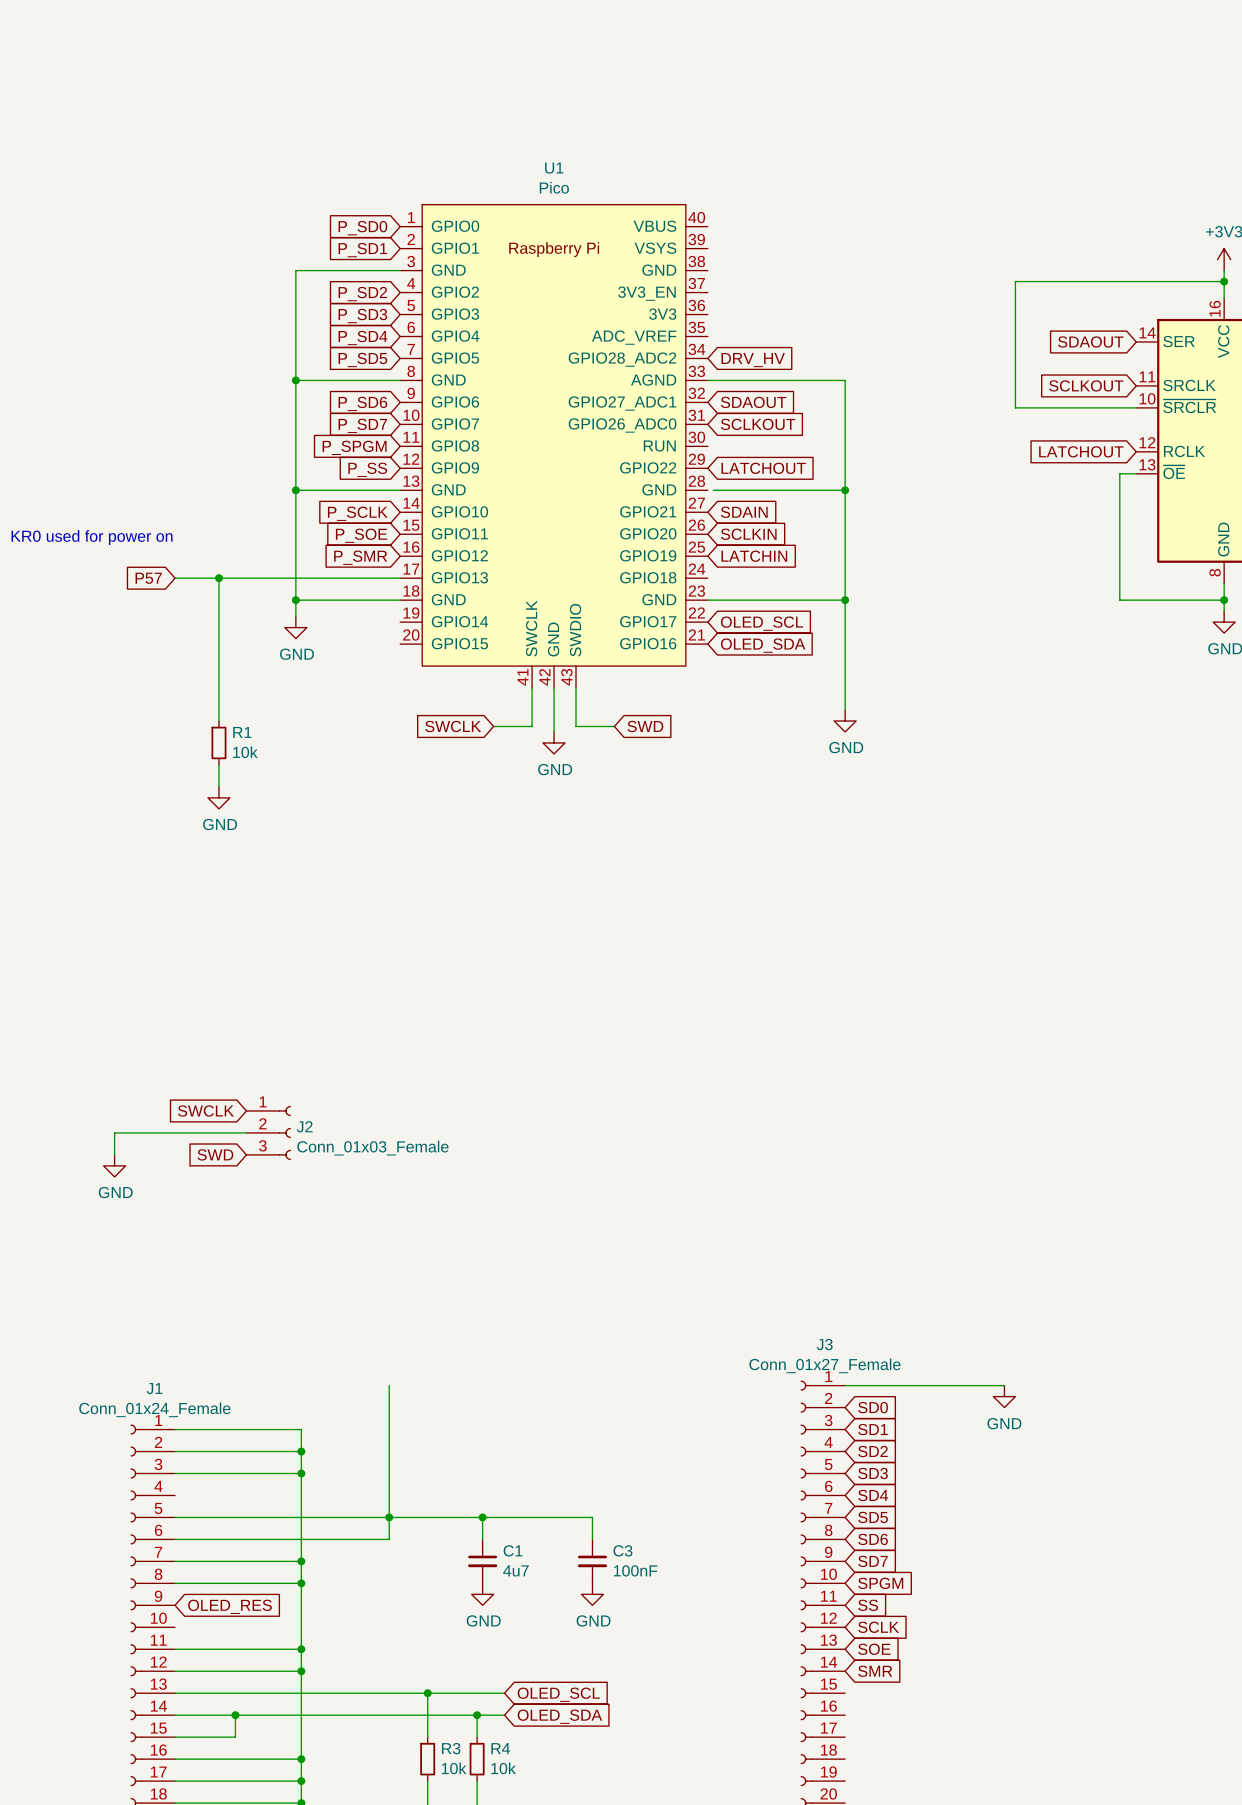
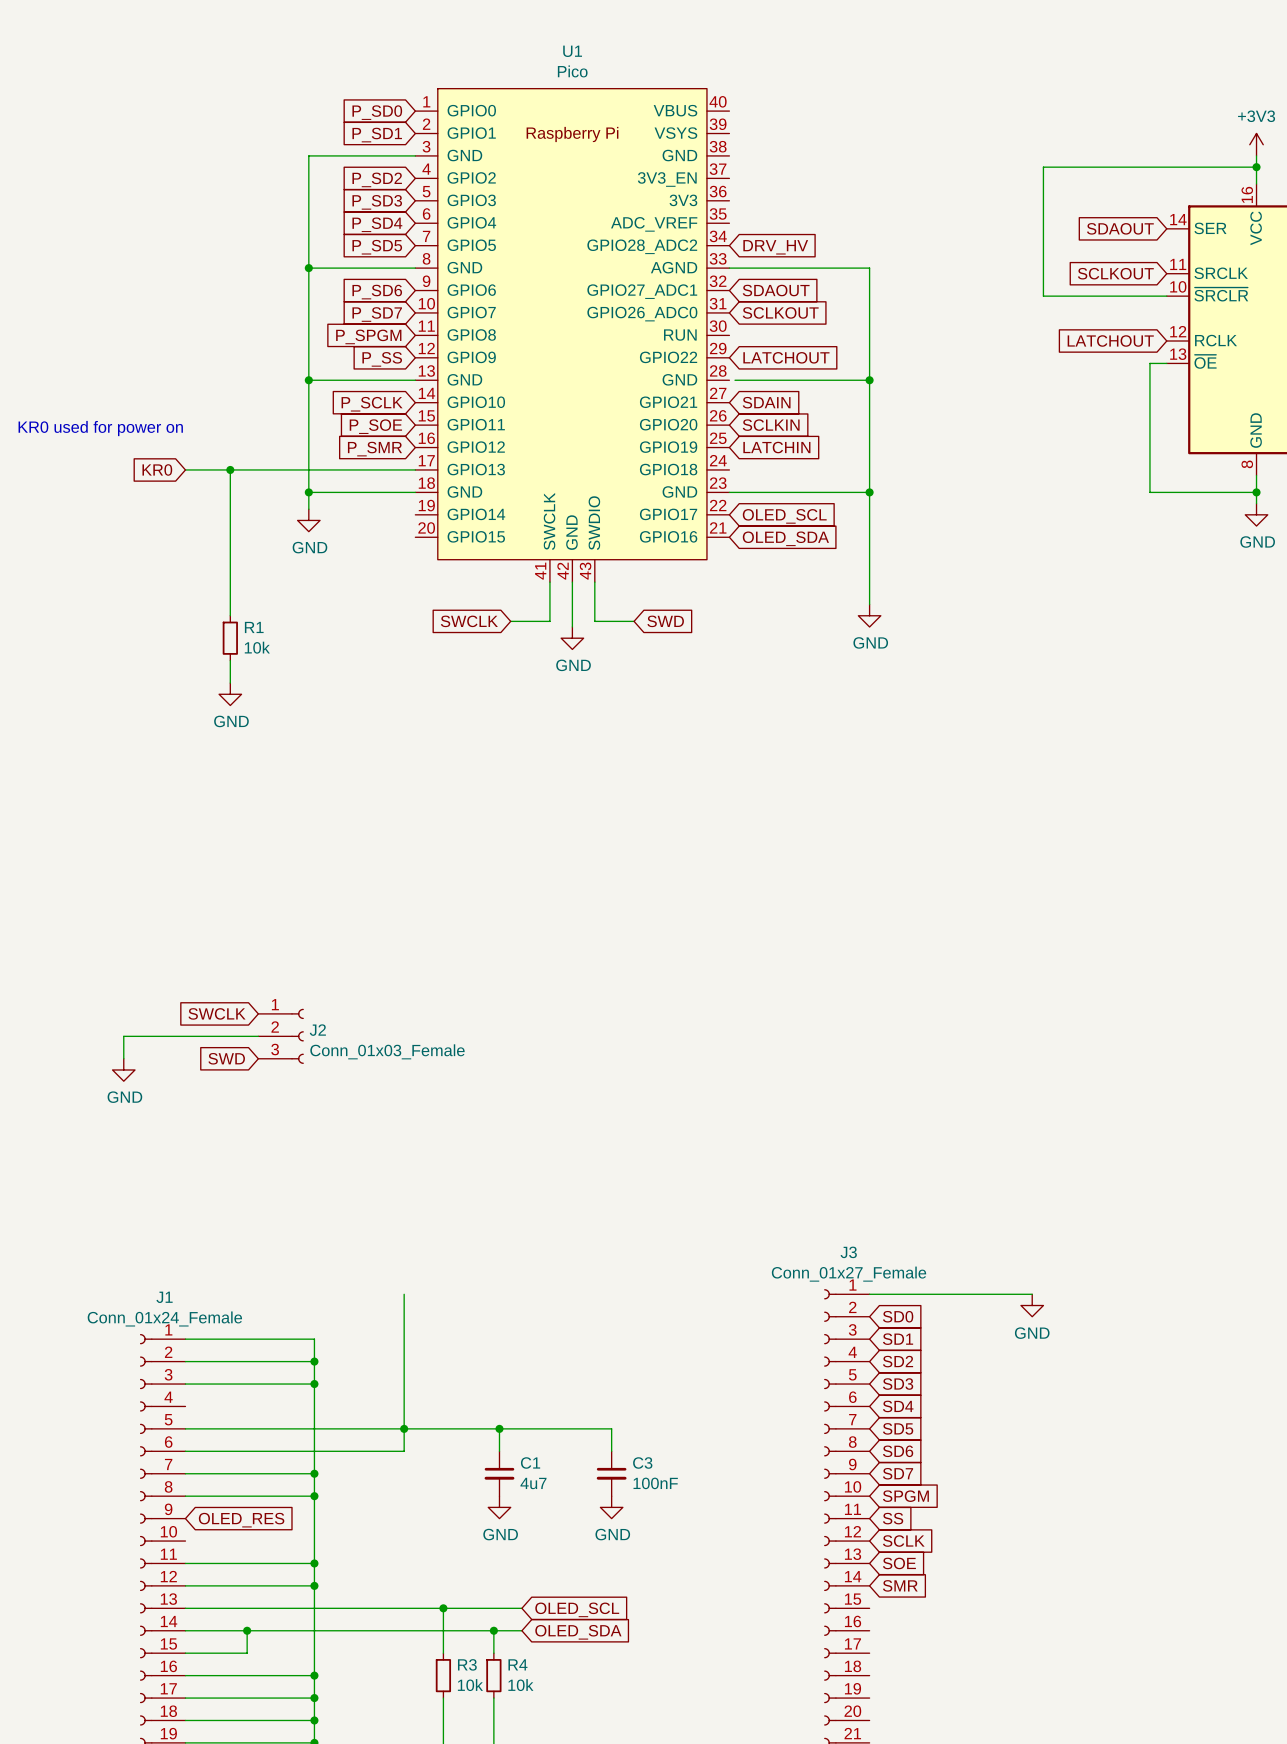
global label: P57 (148, 578) -> KR0 (157, 469)

